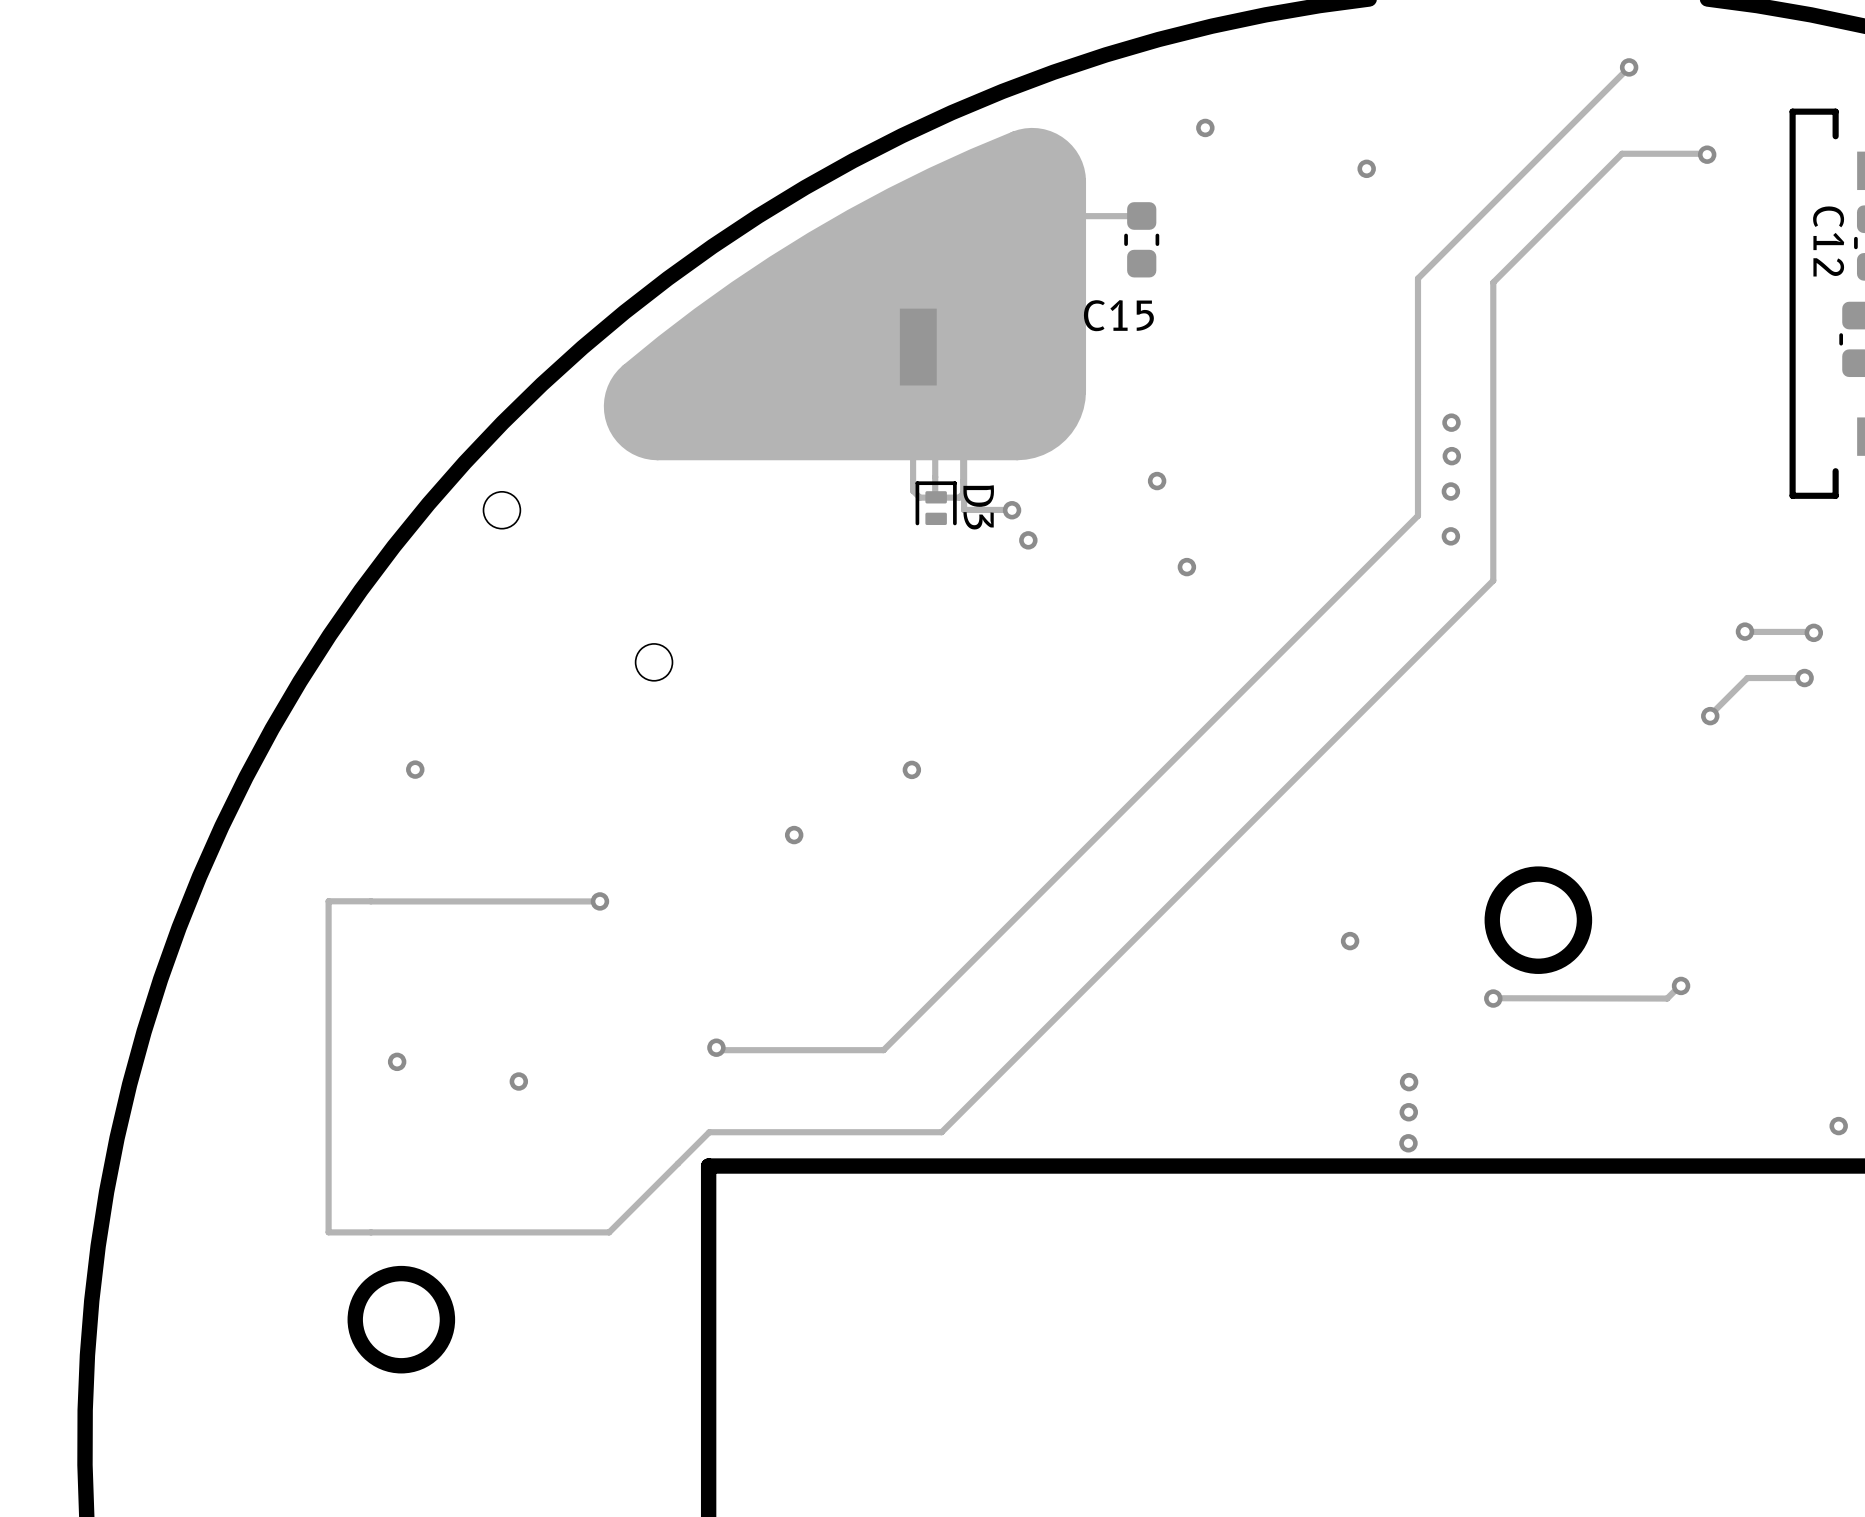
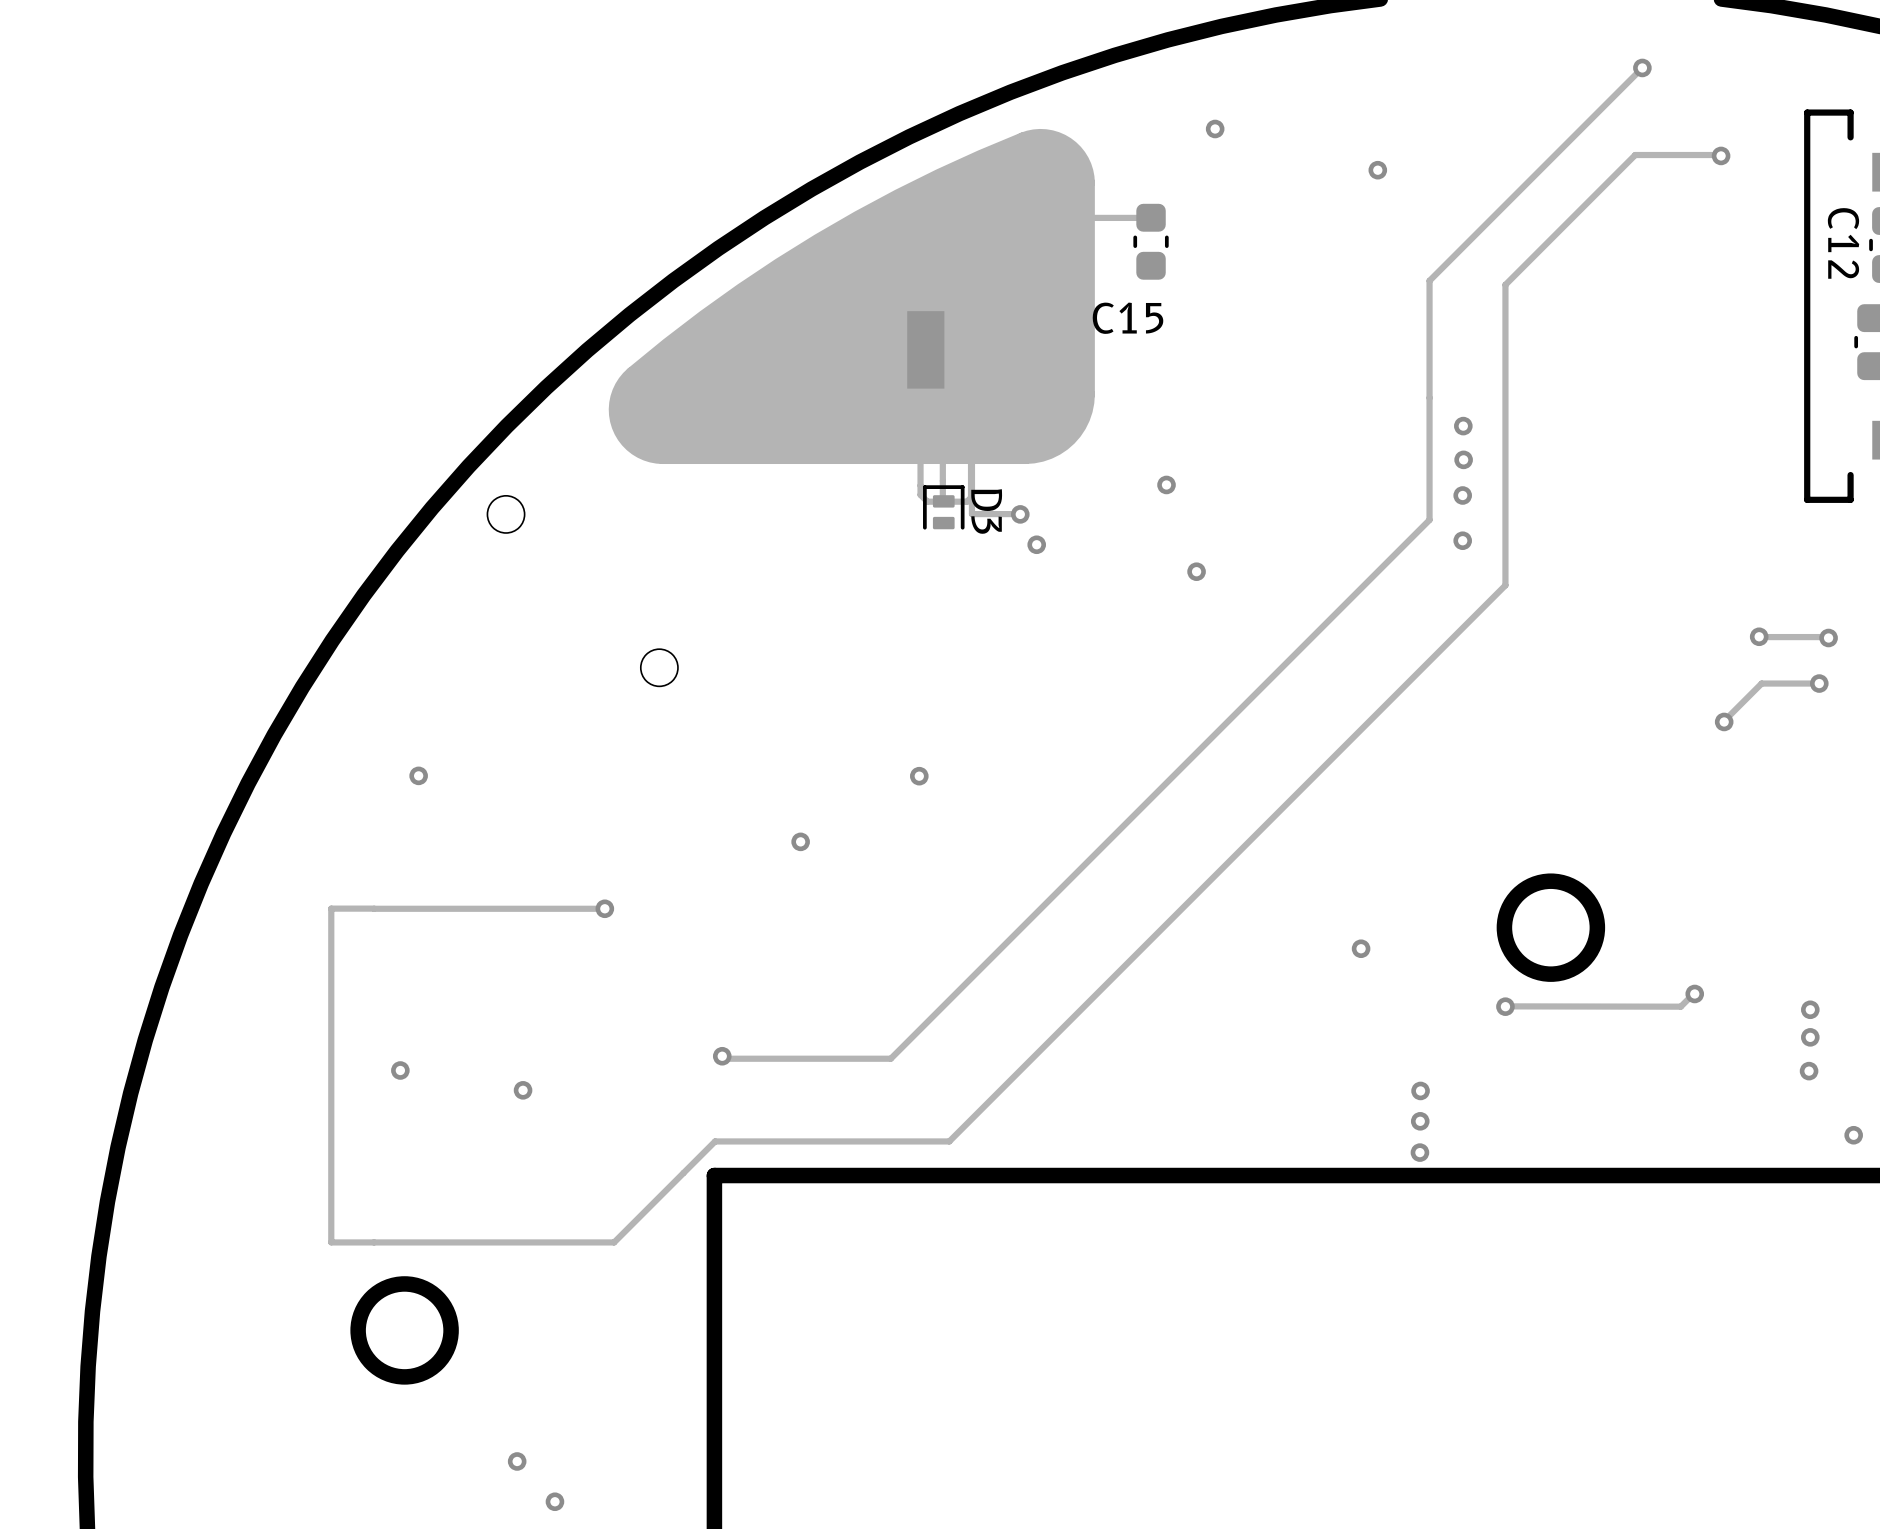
via: none -> (1810, 1009)
via: none -> (1810, 1037)
via: none -> (1809, 1071)
via: none -> (517, 1461)
via: none -> (554, 1501)

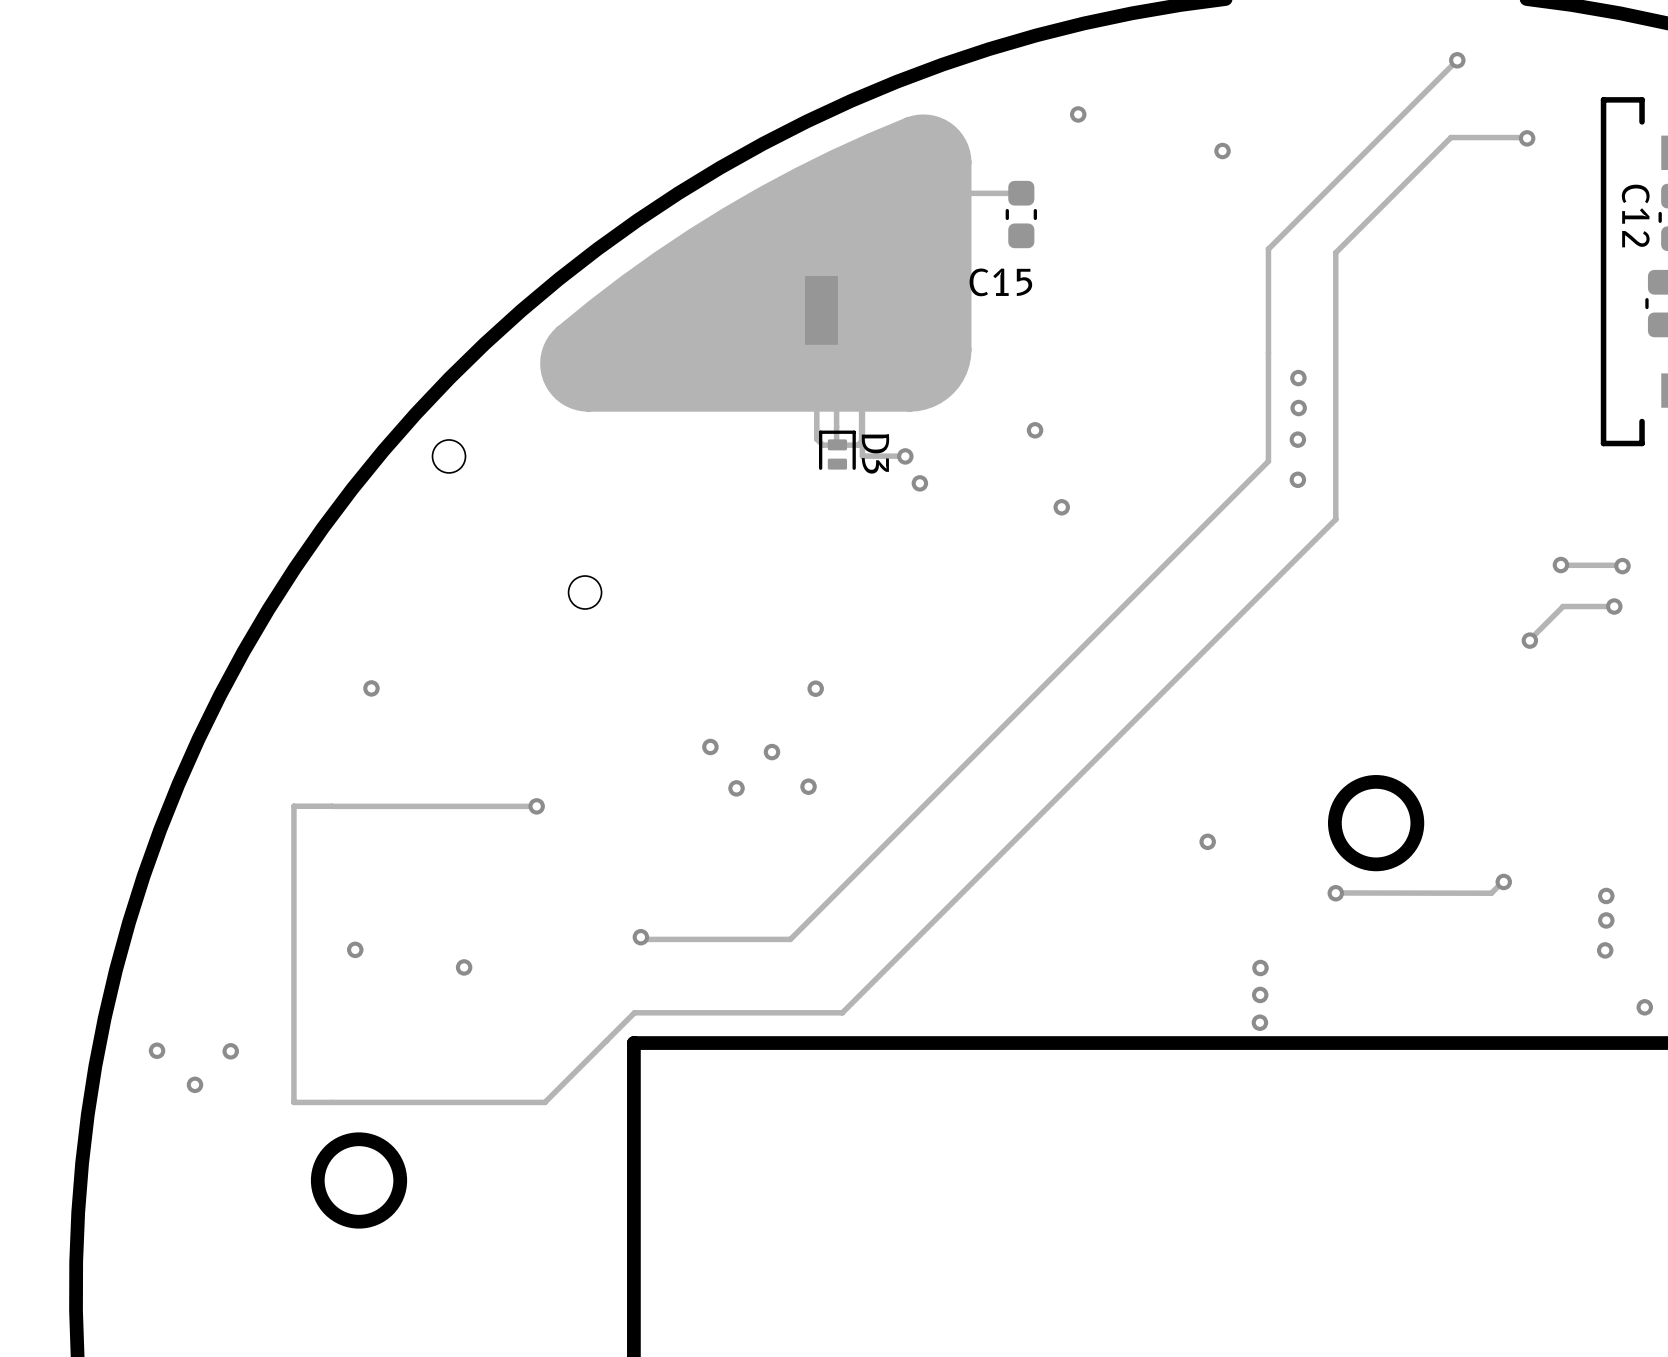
via: none -> (771, 752)
via: none -> (808, 786)
via: none -> (736, 788)
via: none -> (157, 1050)
via: none -> (230, 1051)
via: none -> (194, 1084)
via: (517, 1461) -> none
via: (554, 1501) -> none

